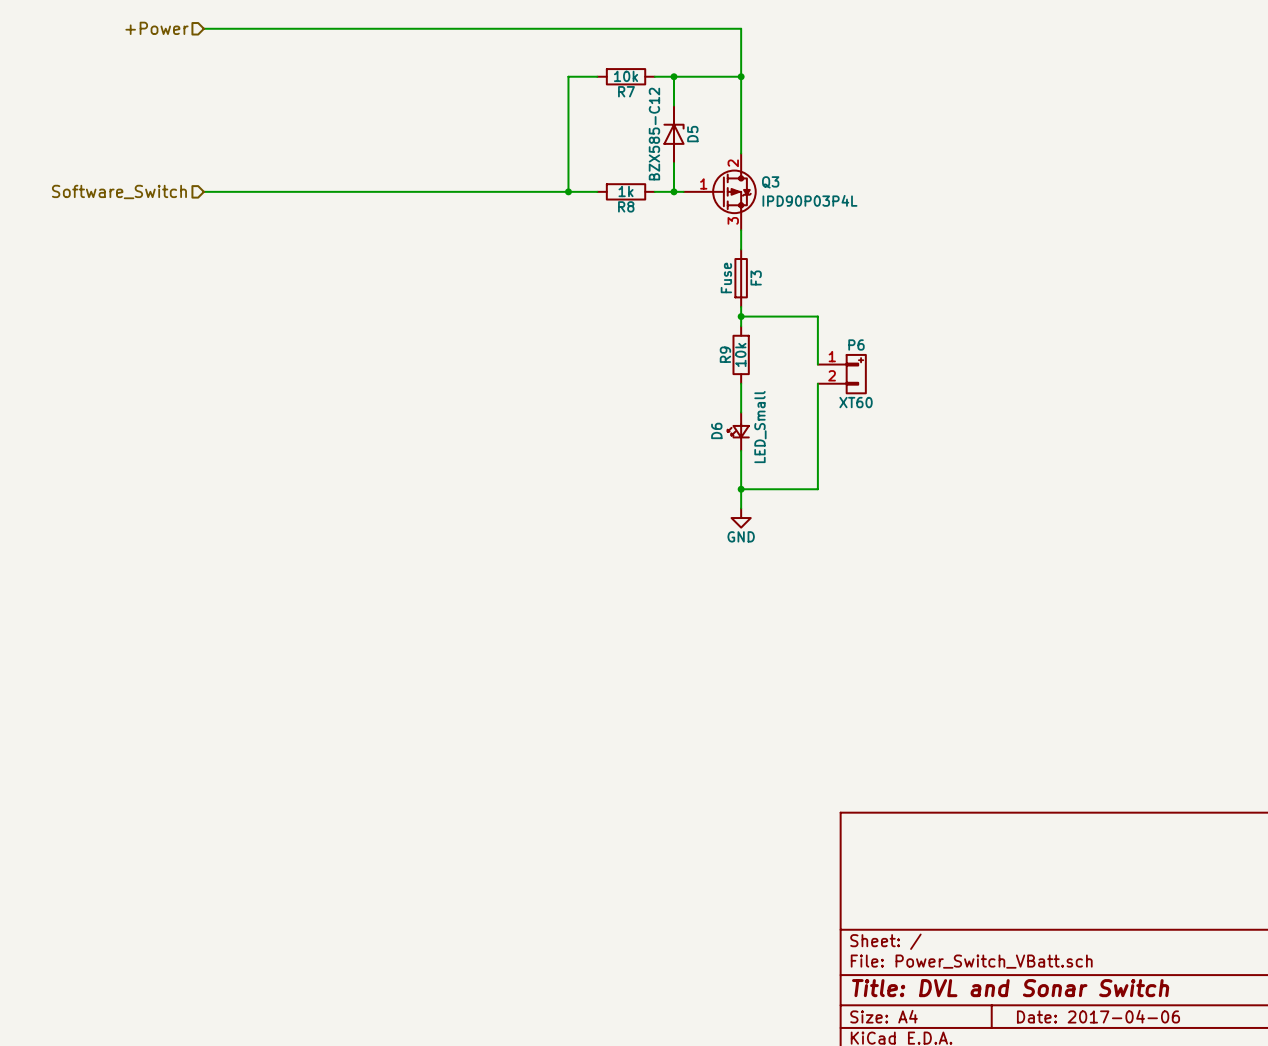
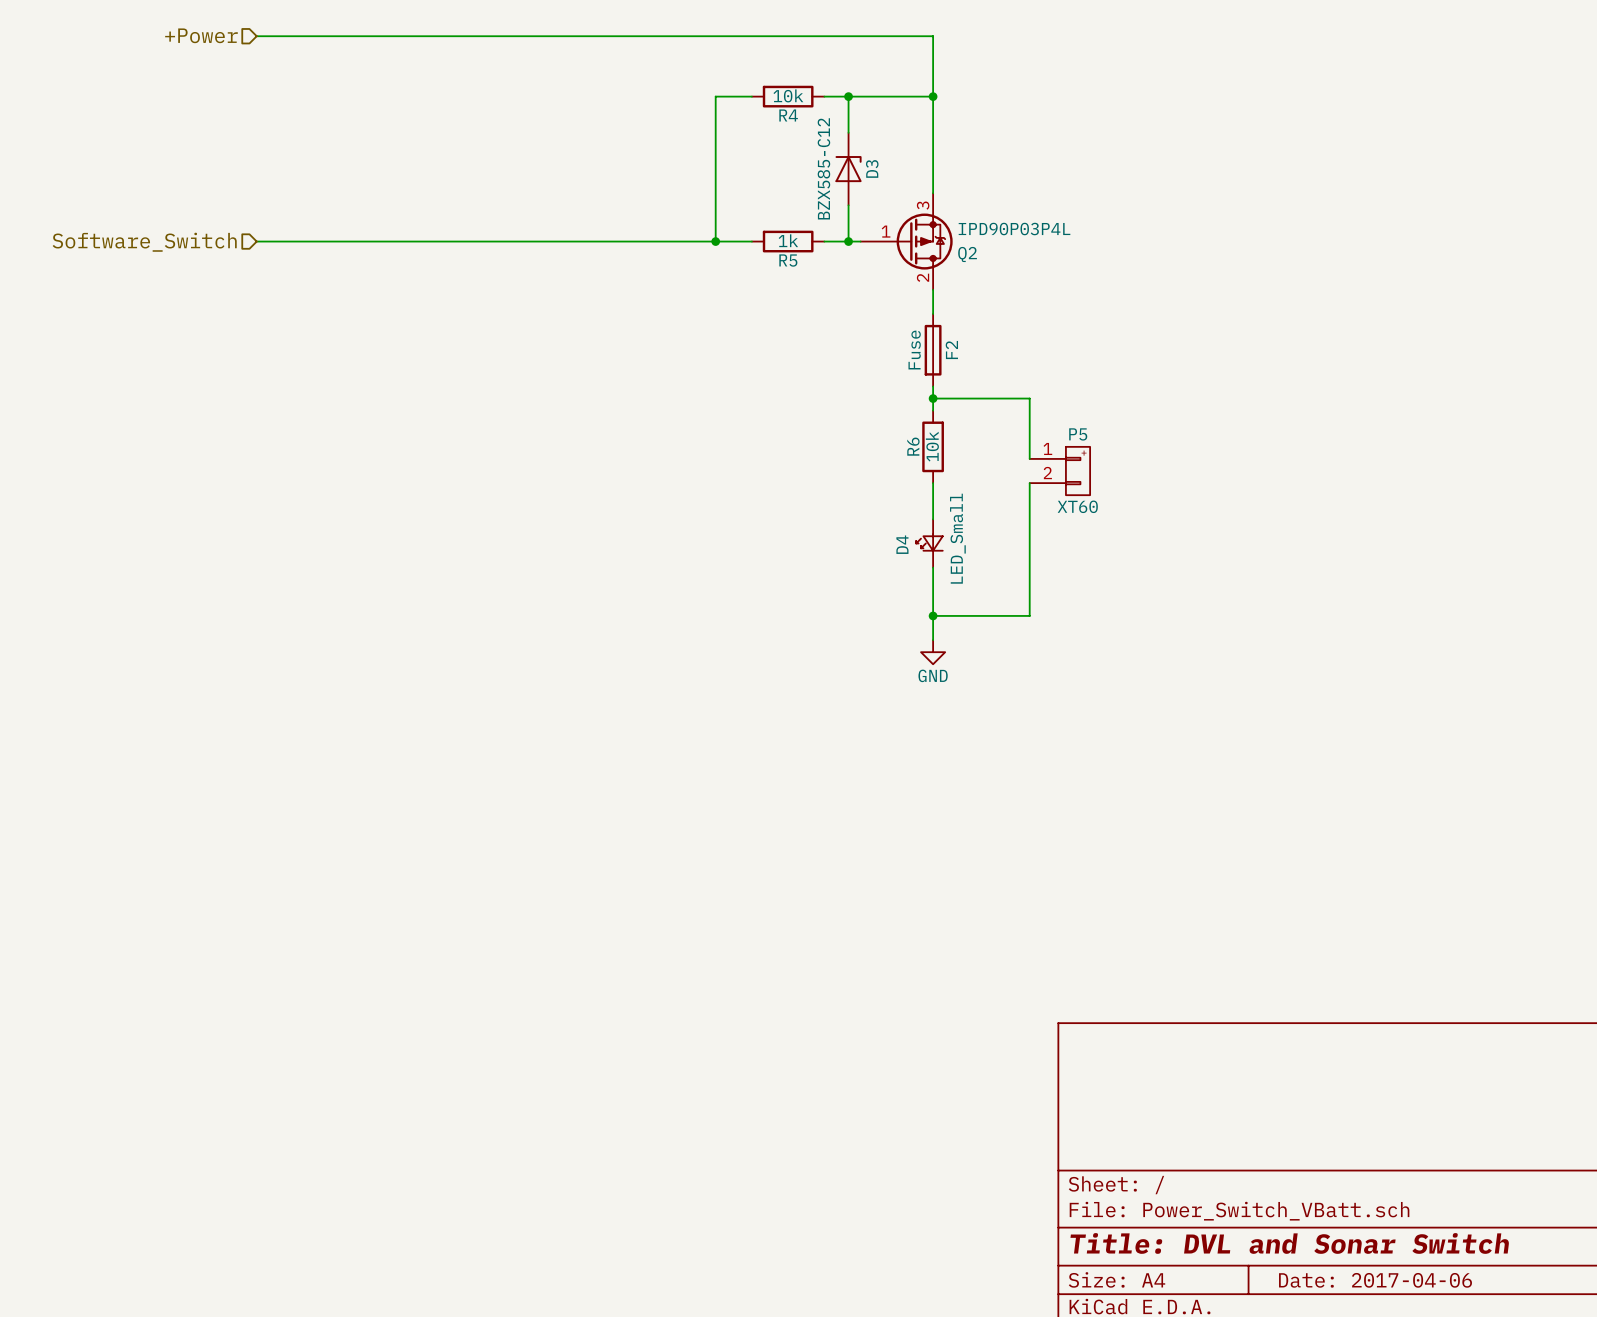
R7 name: R7 (626, 91) -> R4 (788, 115)
D5 name: D5 (692, 134) -> D3 (872, 168)
Q3: IPD90P03P4L (720, 191) -> none
Q2: none -> IPD90P03P4L (906, 241)
R8 name: R8 (626, 206) -> R5 (788, 260)
F3 name: F3 (756, 277) -> F2 (951, 350)
P6 name: P6 (856, 344) -> P5 (1078, 434)
R9 name: R9 (725, 354) -> R6 (913, 446)
D6 name: D6 (716, 430) -> D4 (902, 544)

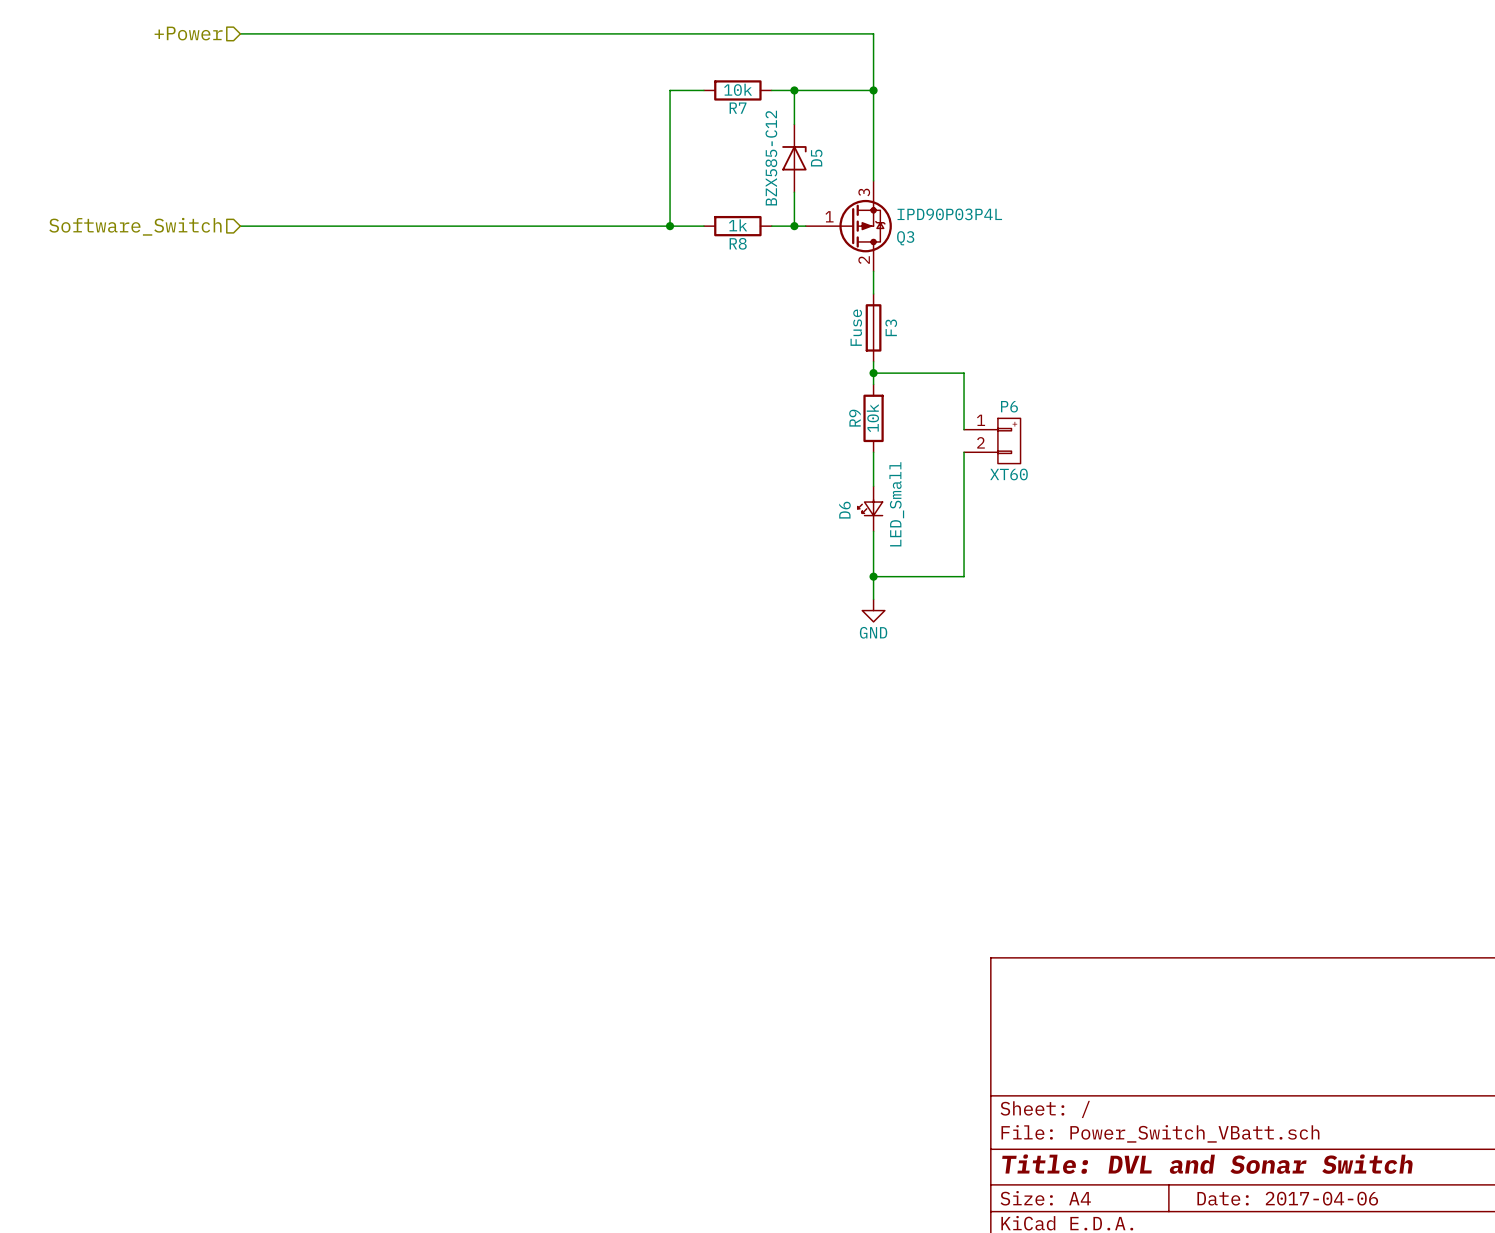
R4 name: R4 (788, 115) -> R7 (738, 108)
D3 name: D3 (872, 168) -> D5 (816, 158)
Q2 name: Q2 (967, 254) -> Q3 (905, 238)
R5 name: R5 (788, 260) -> R8 (738, 243)
F2 name: F2 (951, 350) -> F3 (891, 327)
P5 name: P5 (1078, 434) -> P6 (1009, 406)
R6 name: R6 (913, 446) -> R9 (854, 418)
D4 name: D4 (902, 544) -> D6 (844, 510)

